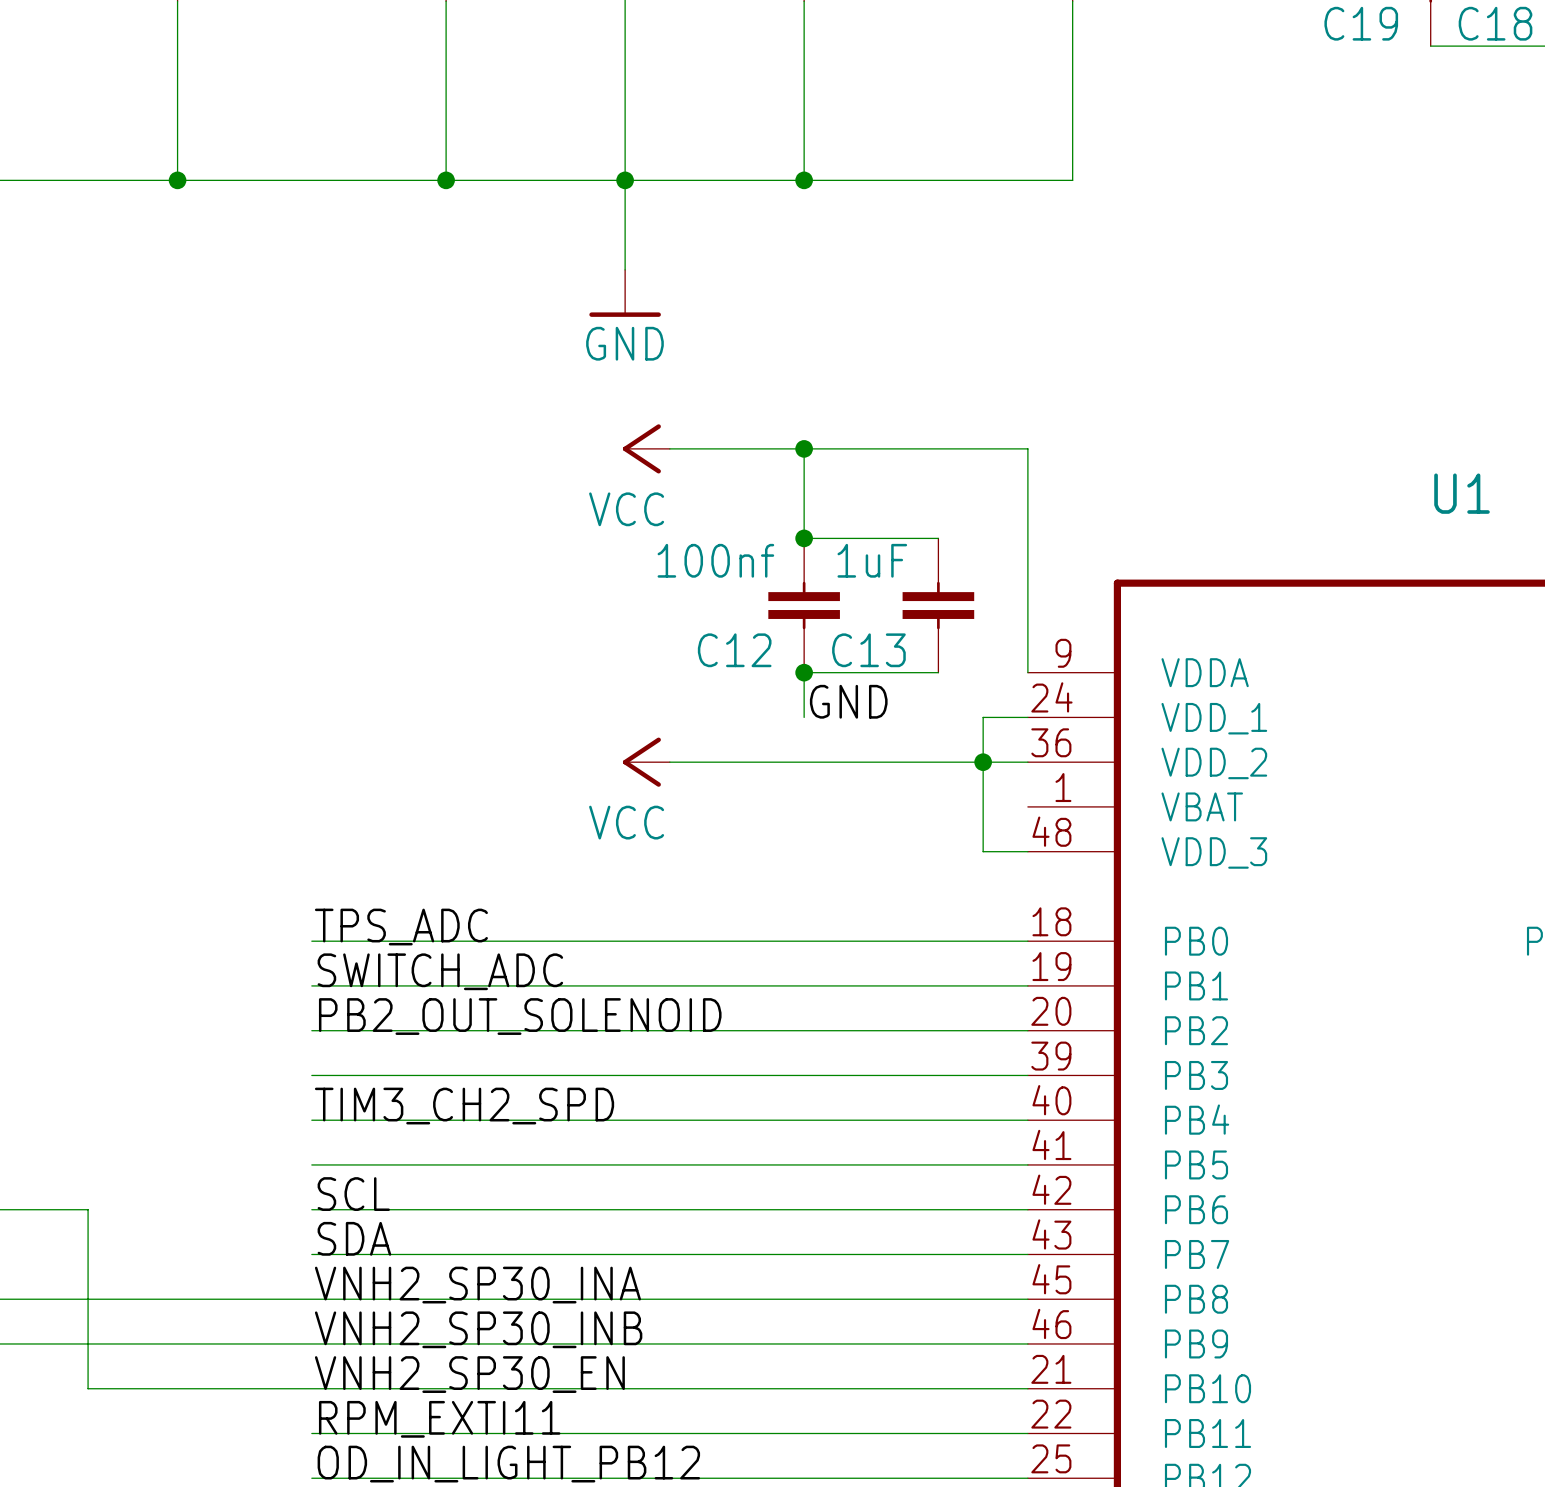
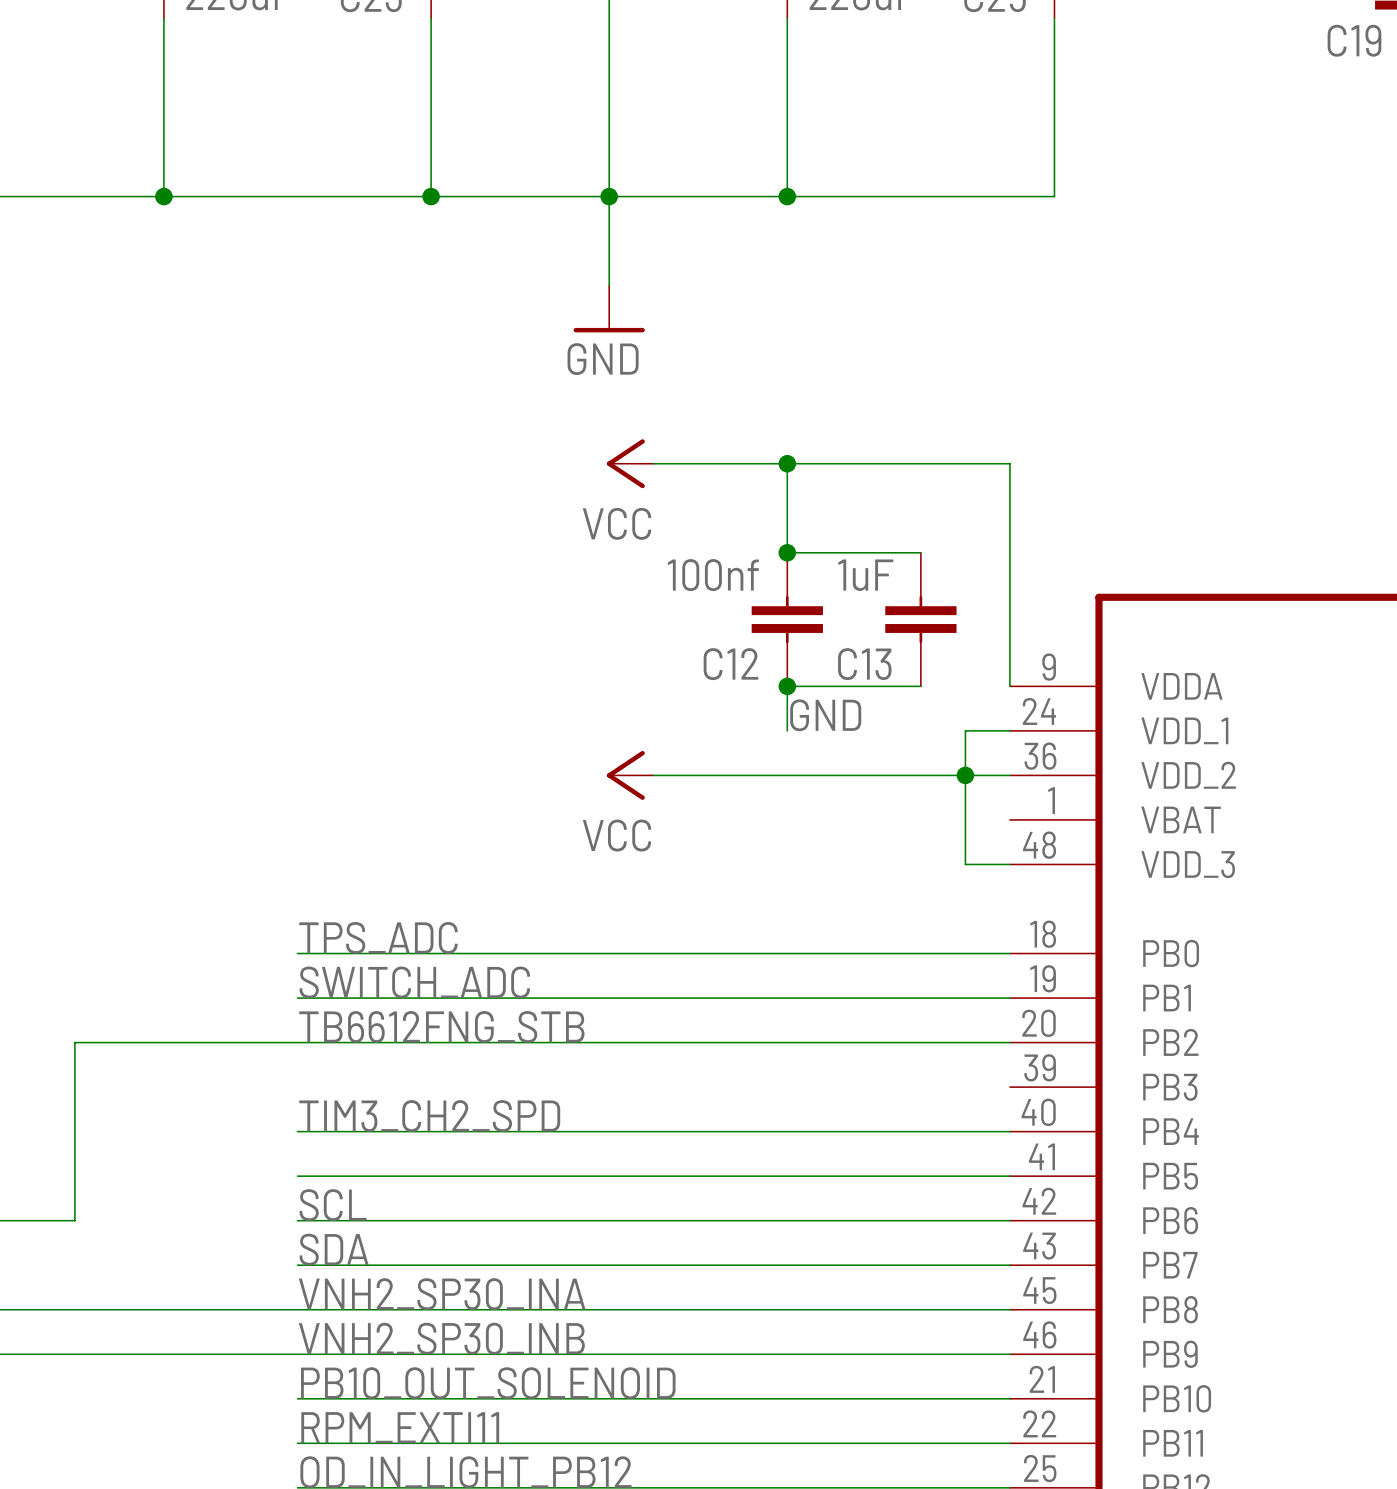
label: PB2_OUT_SOLENOID (520, 1016) -> TB6612FNG_STB (441, 1026)
wire: (311, 1075) (1027, 1075) -> none
wire: (88, 1209) (88, 1388) (311, 1388) -> (74, 1220) (74, 1042) (297, 1042)
label: VNH2_SP30_EN (469, 1374) -> PB10_OUT_SOLENOID (488, 1383)

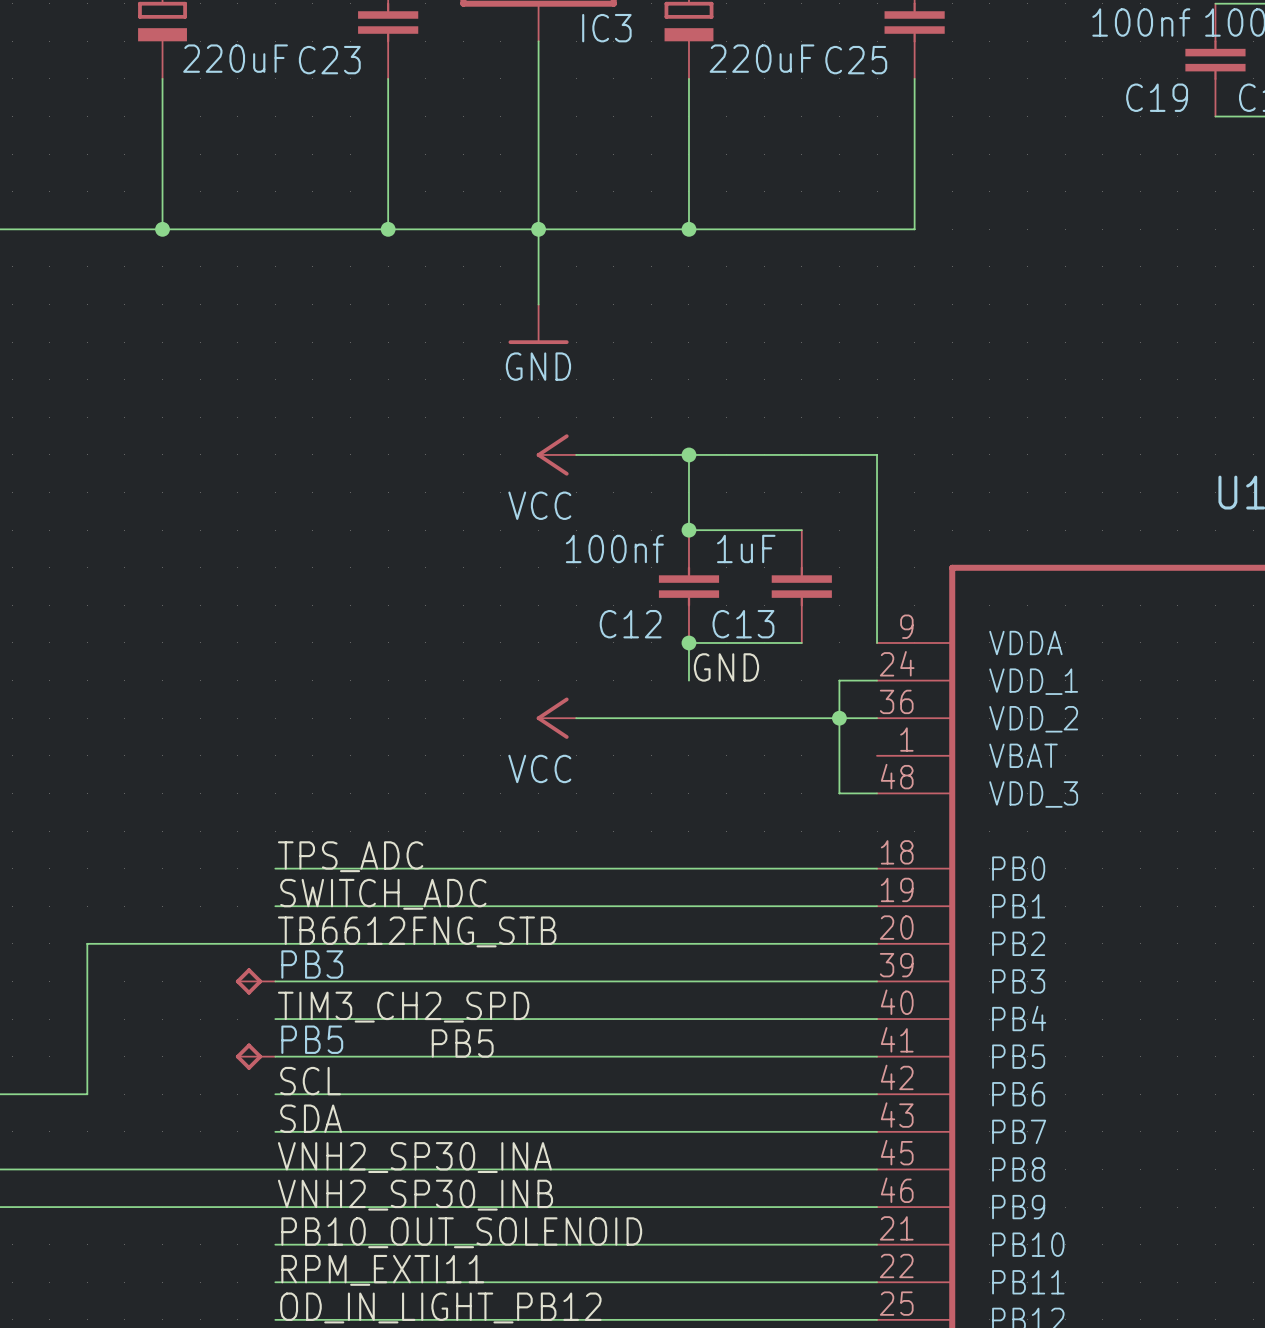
PB3: none -> (255, 981)
wire: none -> (275, 981) (877, 981)
label: none -> PB5 (462, 1043)
PB5: none -> (255, 1056)

